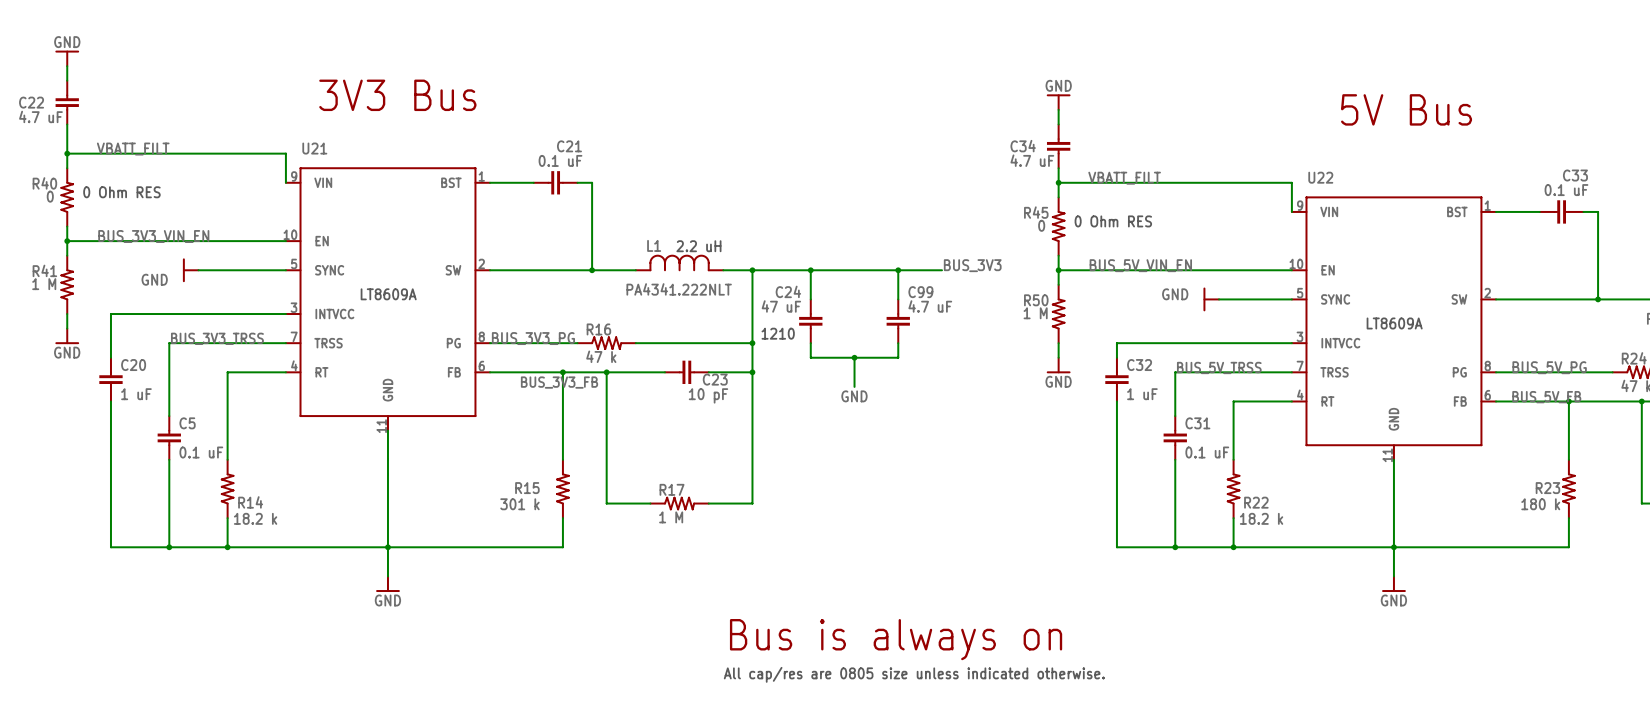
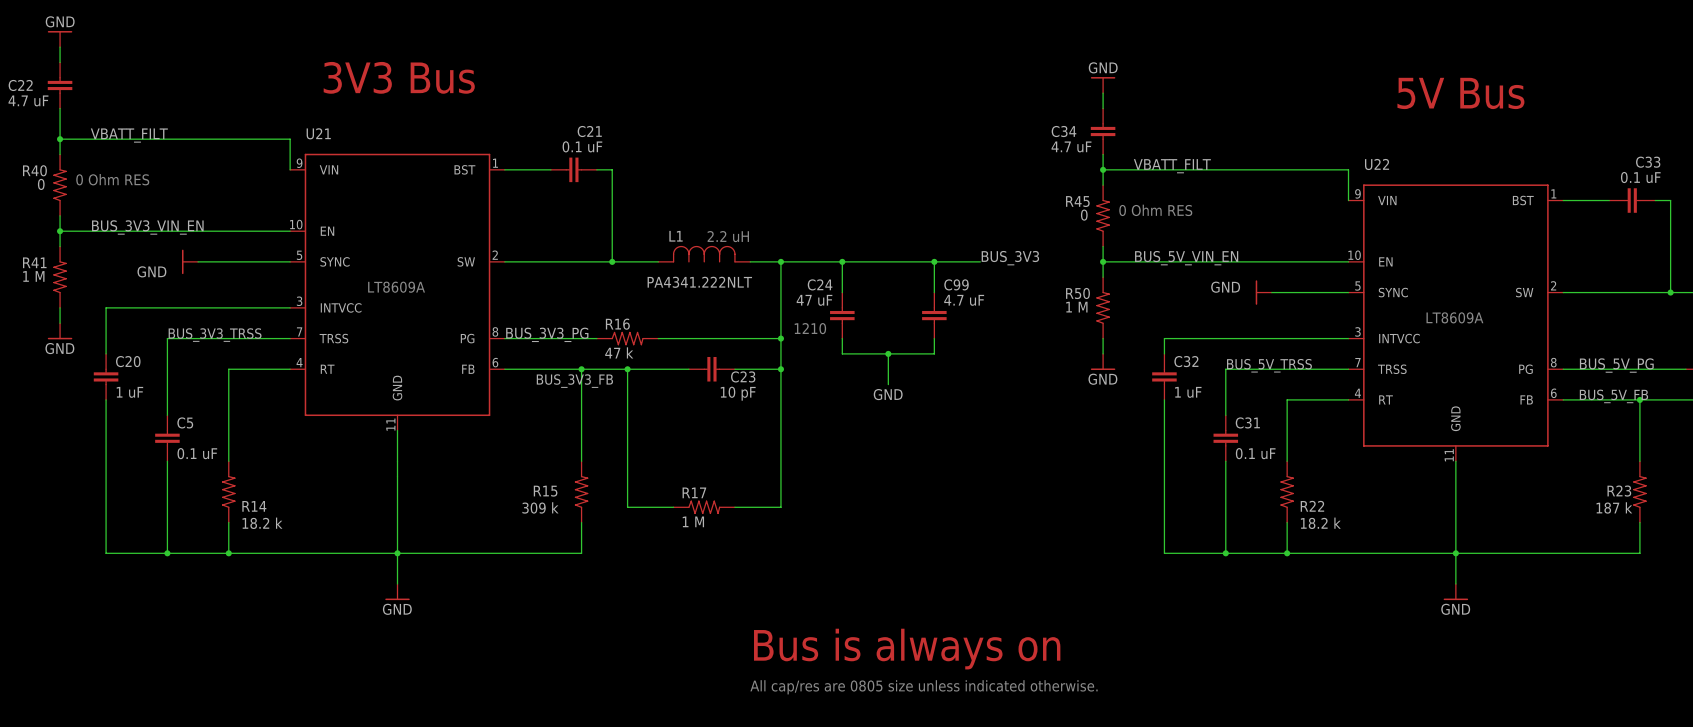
R15 value: 301 k (519, 504) -> 309 k (540, 507)
R23 value: 180 k (1540, 504) -> 187 k (1614, 507)

